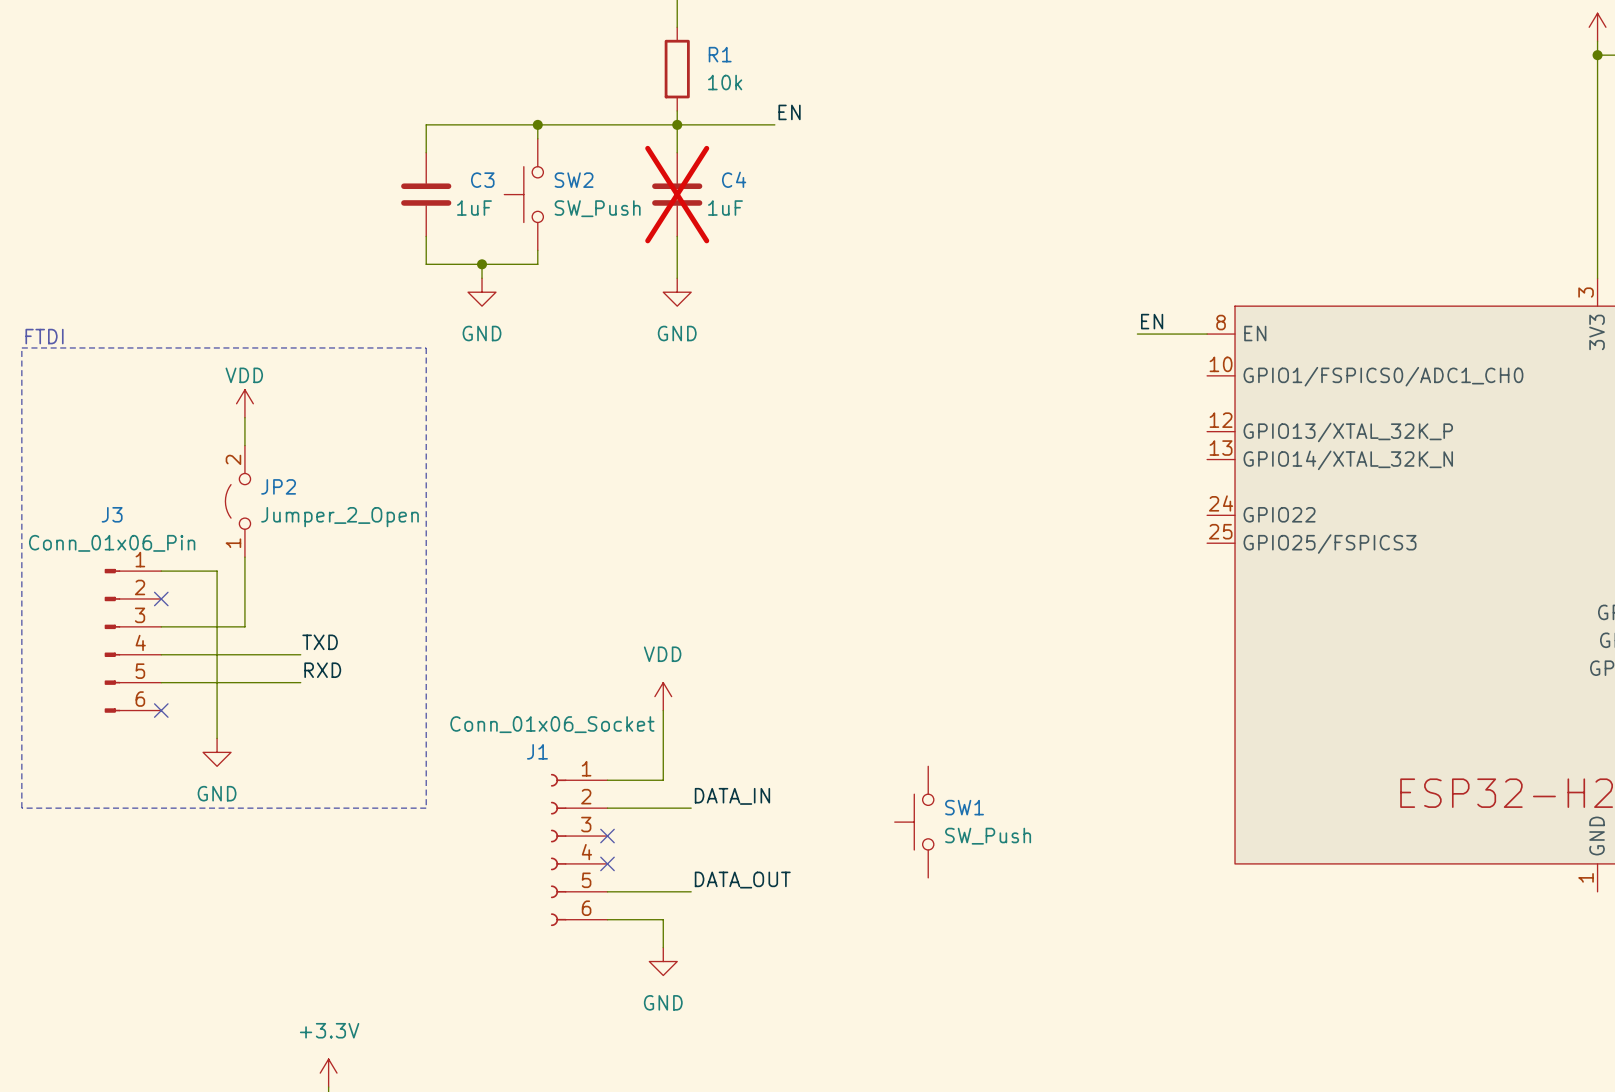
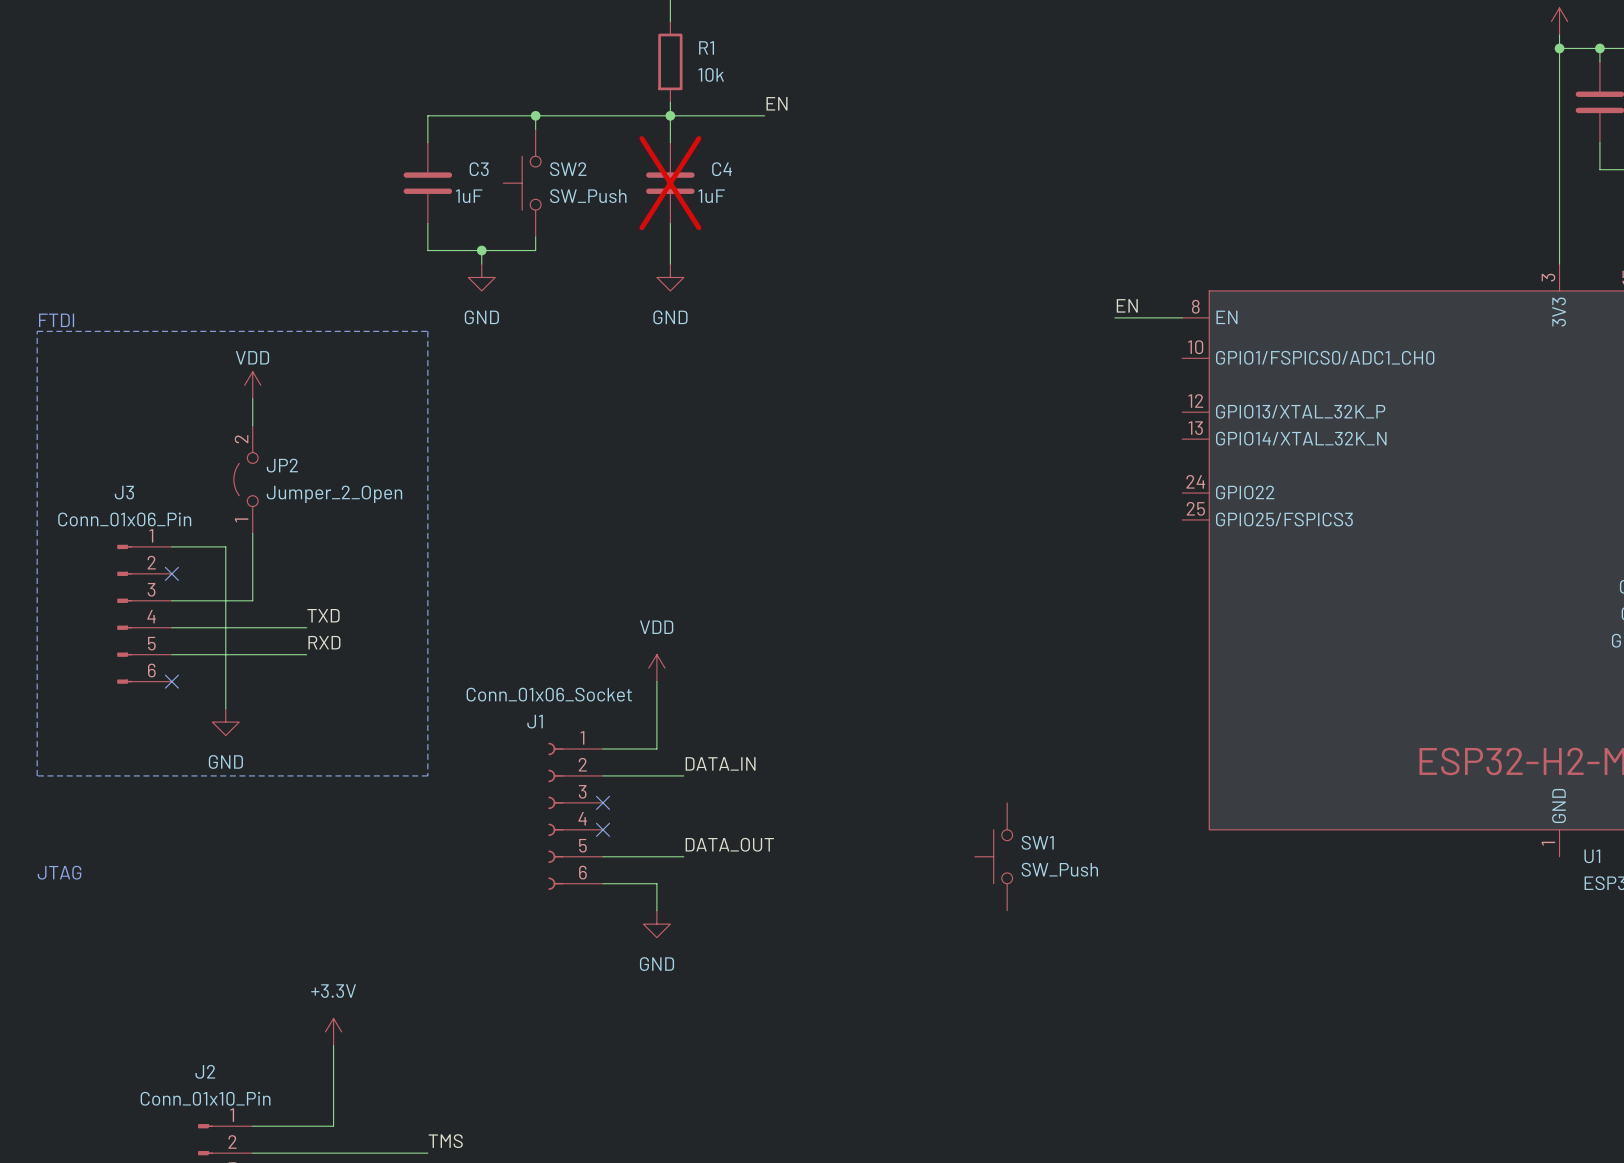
SW1 position: (914, 822) -> (993, 856)
text: none -> JTAG (59, 872)

